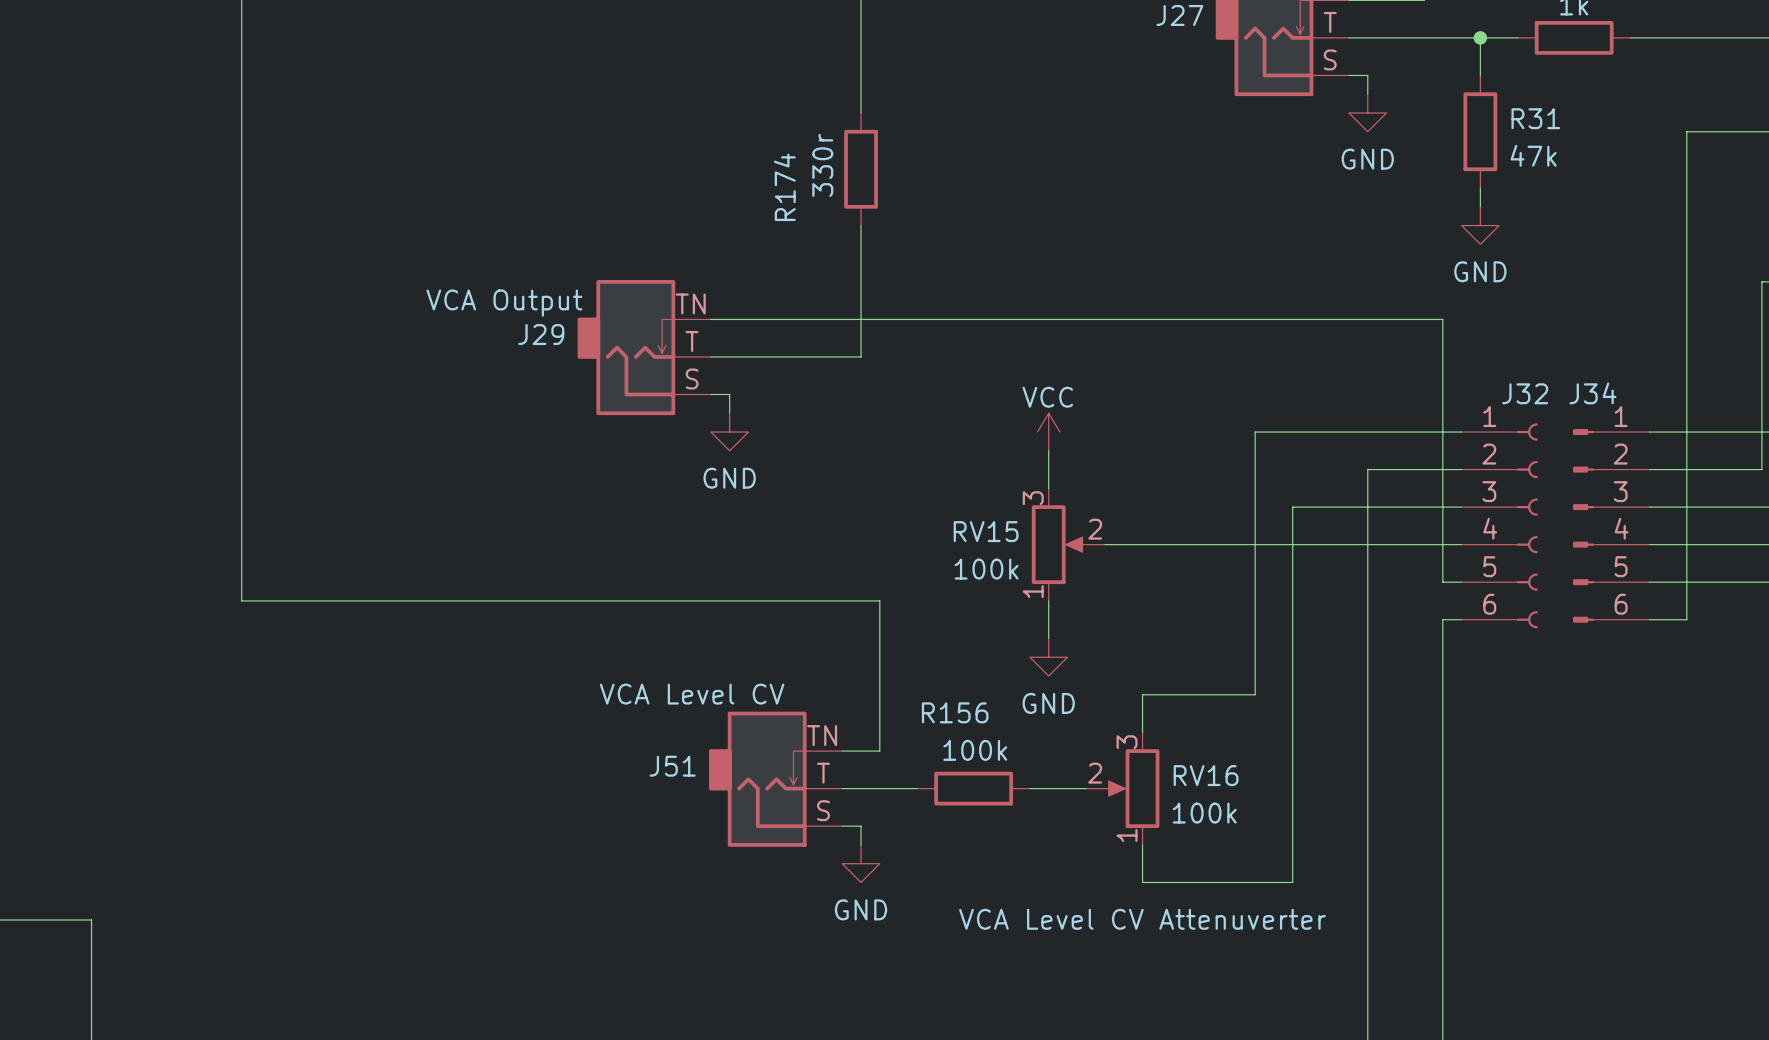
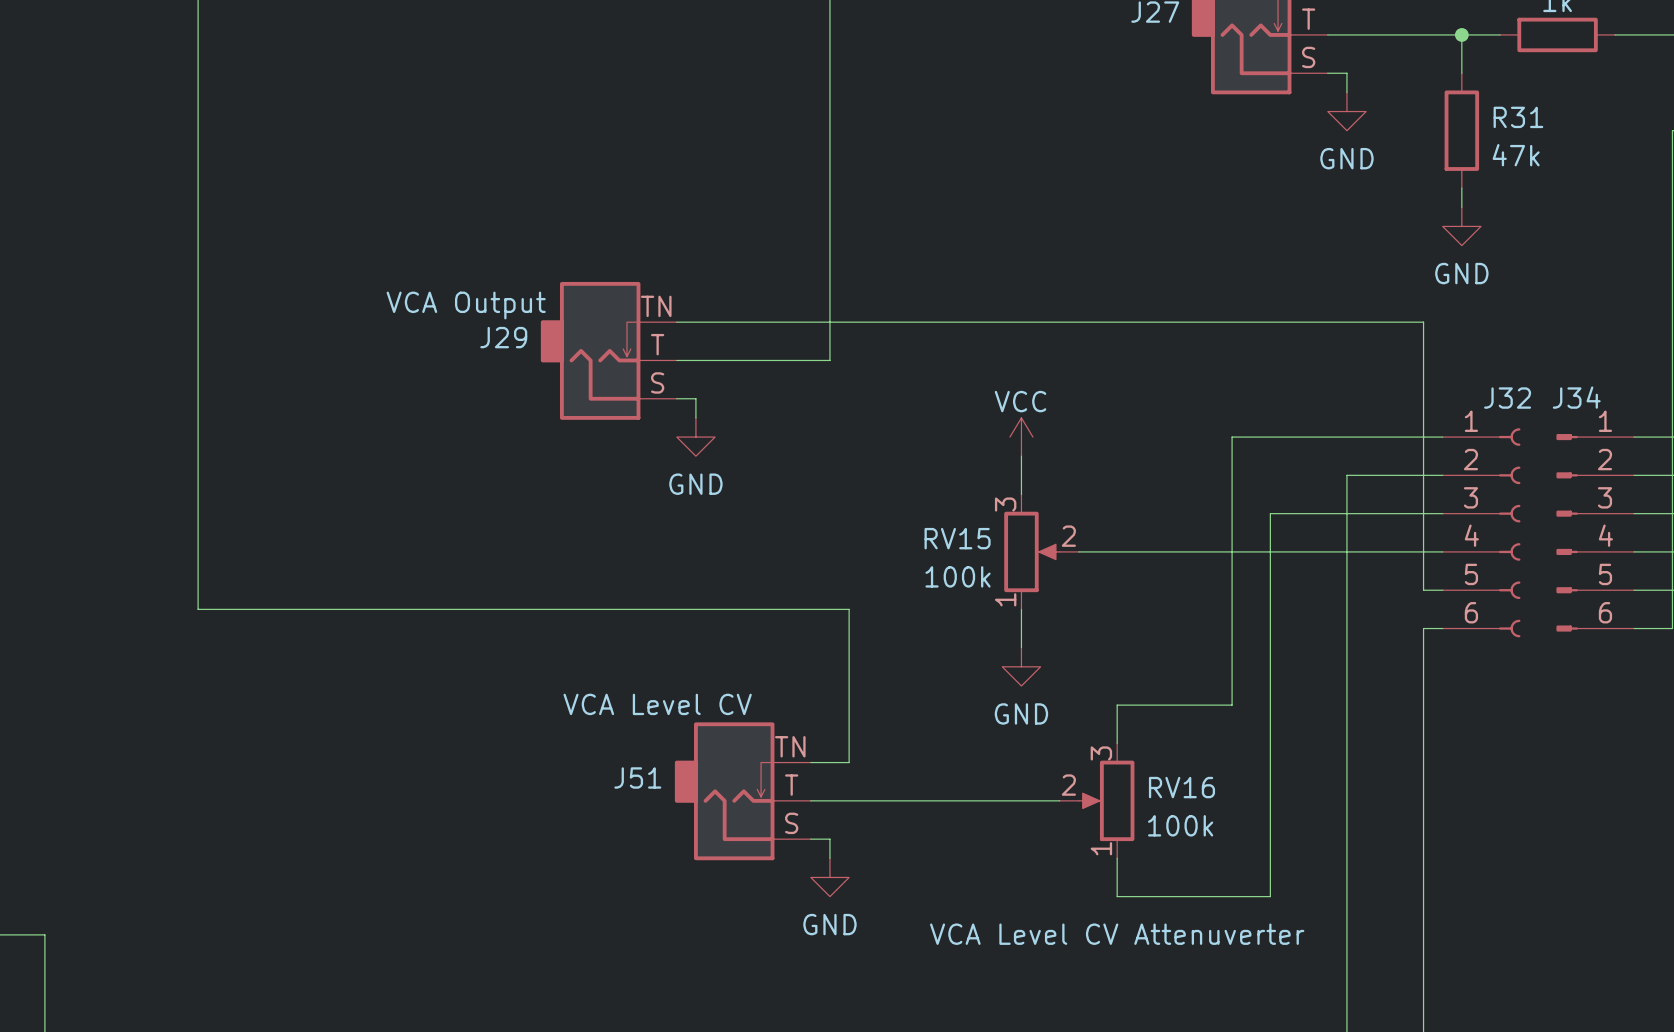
wire: none -> (829, 111) (829, 226)
R174: 330r (861, 169) -> none
wire: none -> (887, 800) (1002, 800)
R156: 100k (973, 788) -> none

